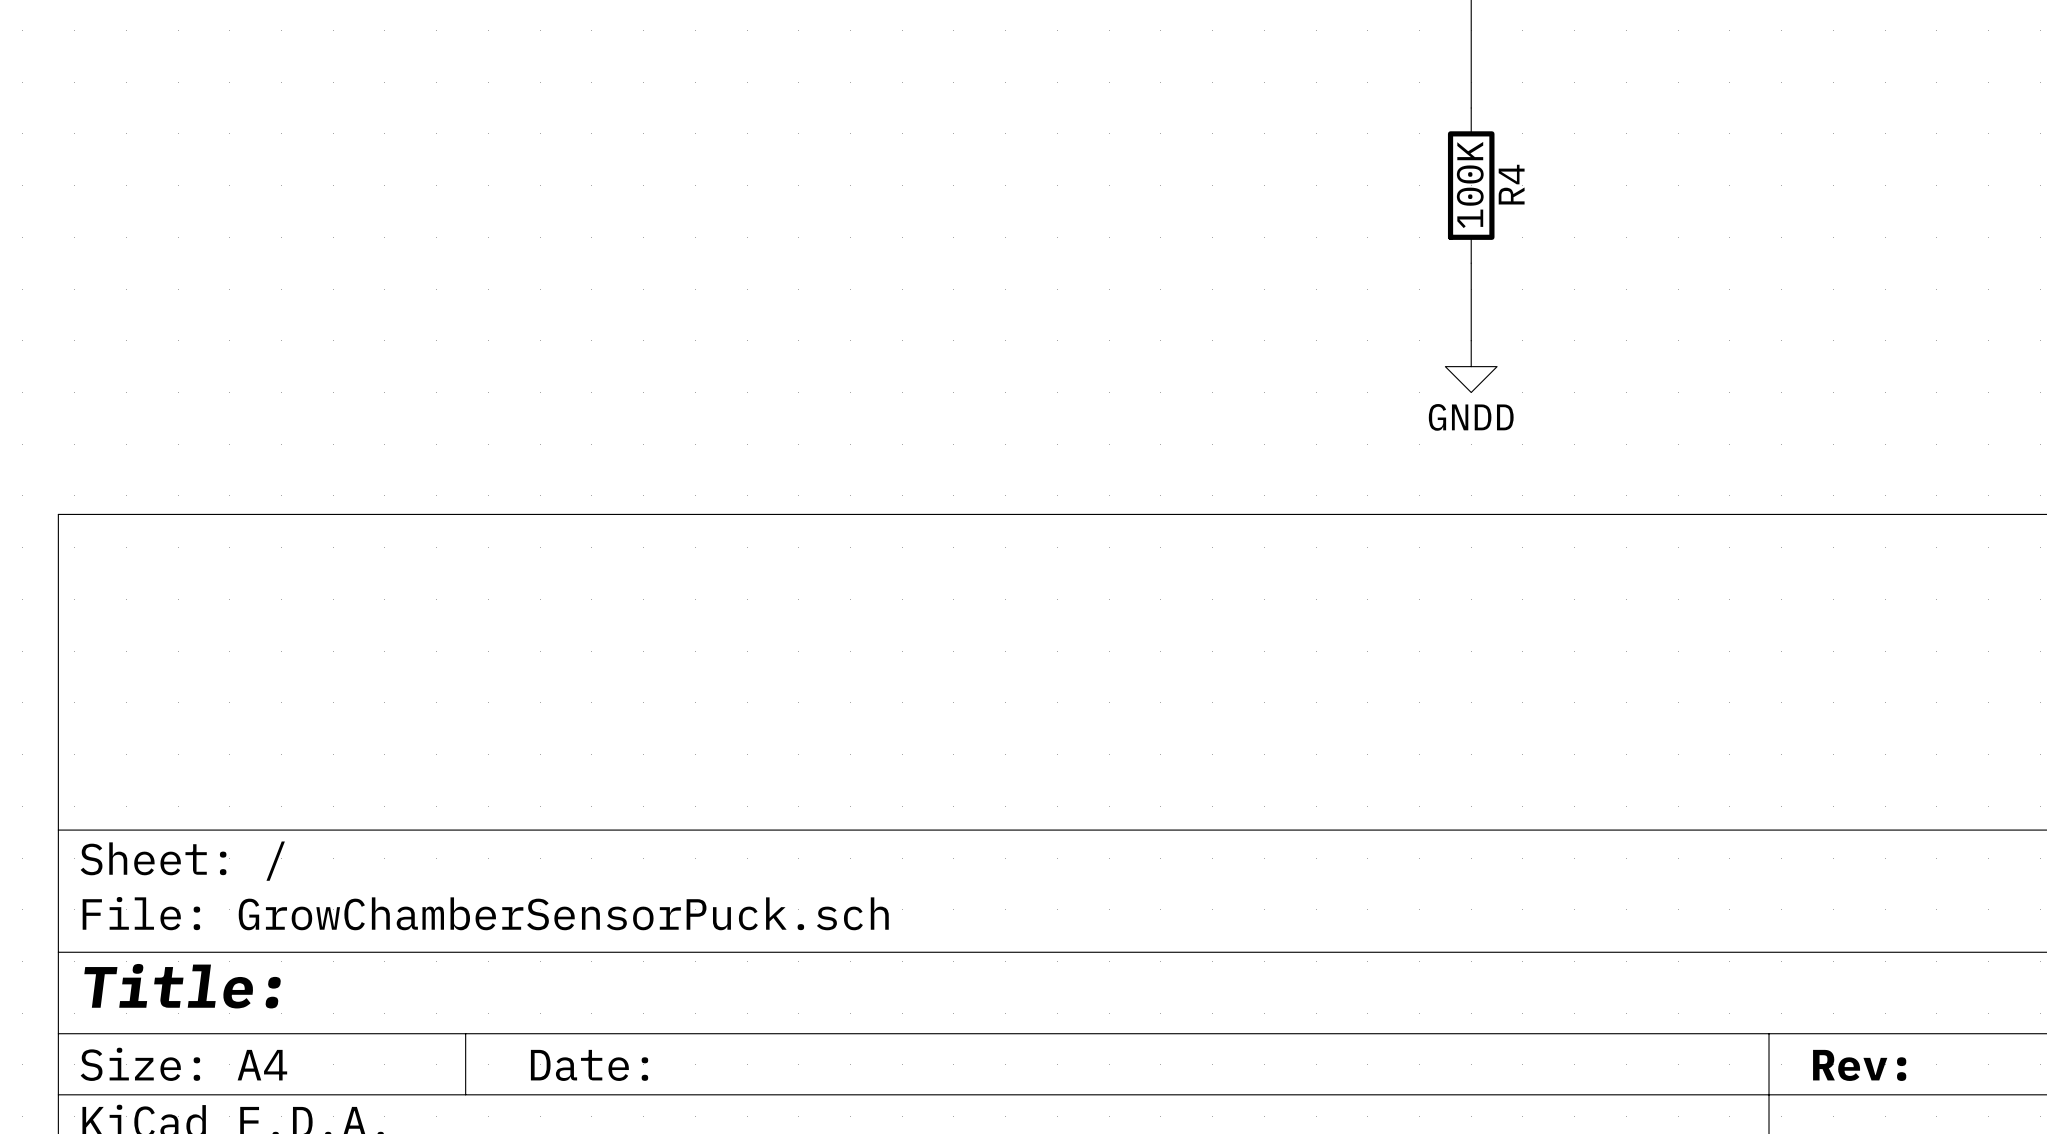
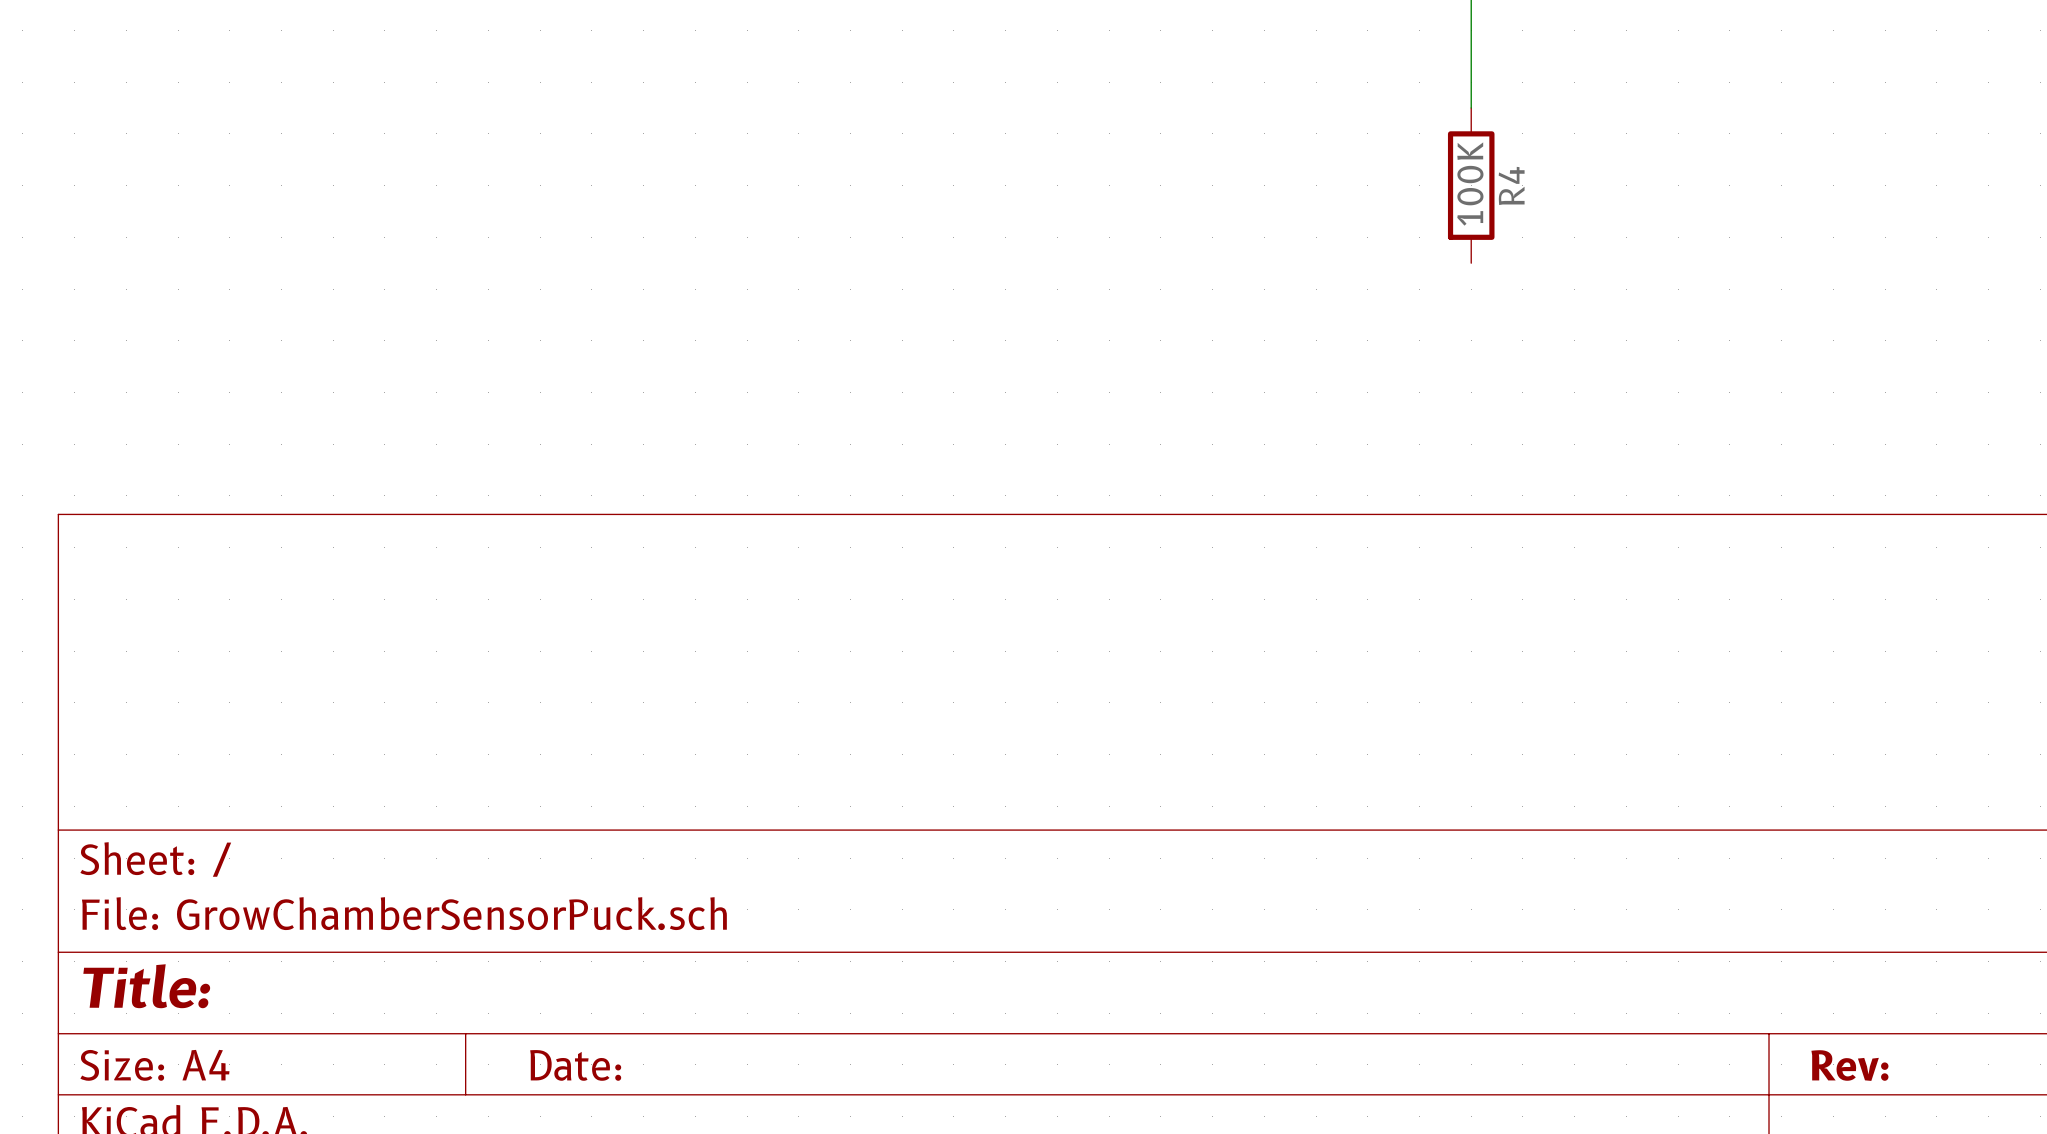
wire: (1471, 263) (1471, 340) -> none
power symbol: GNDD (1471, 366) -> none

